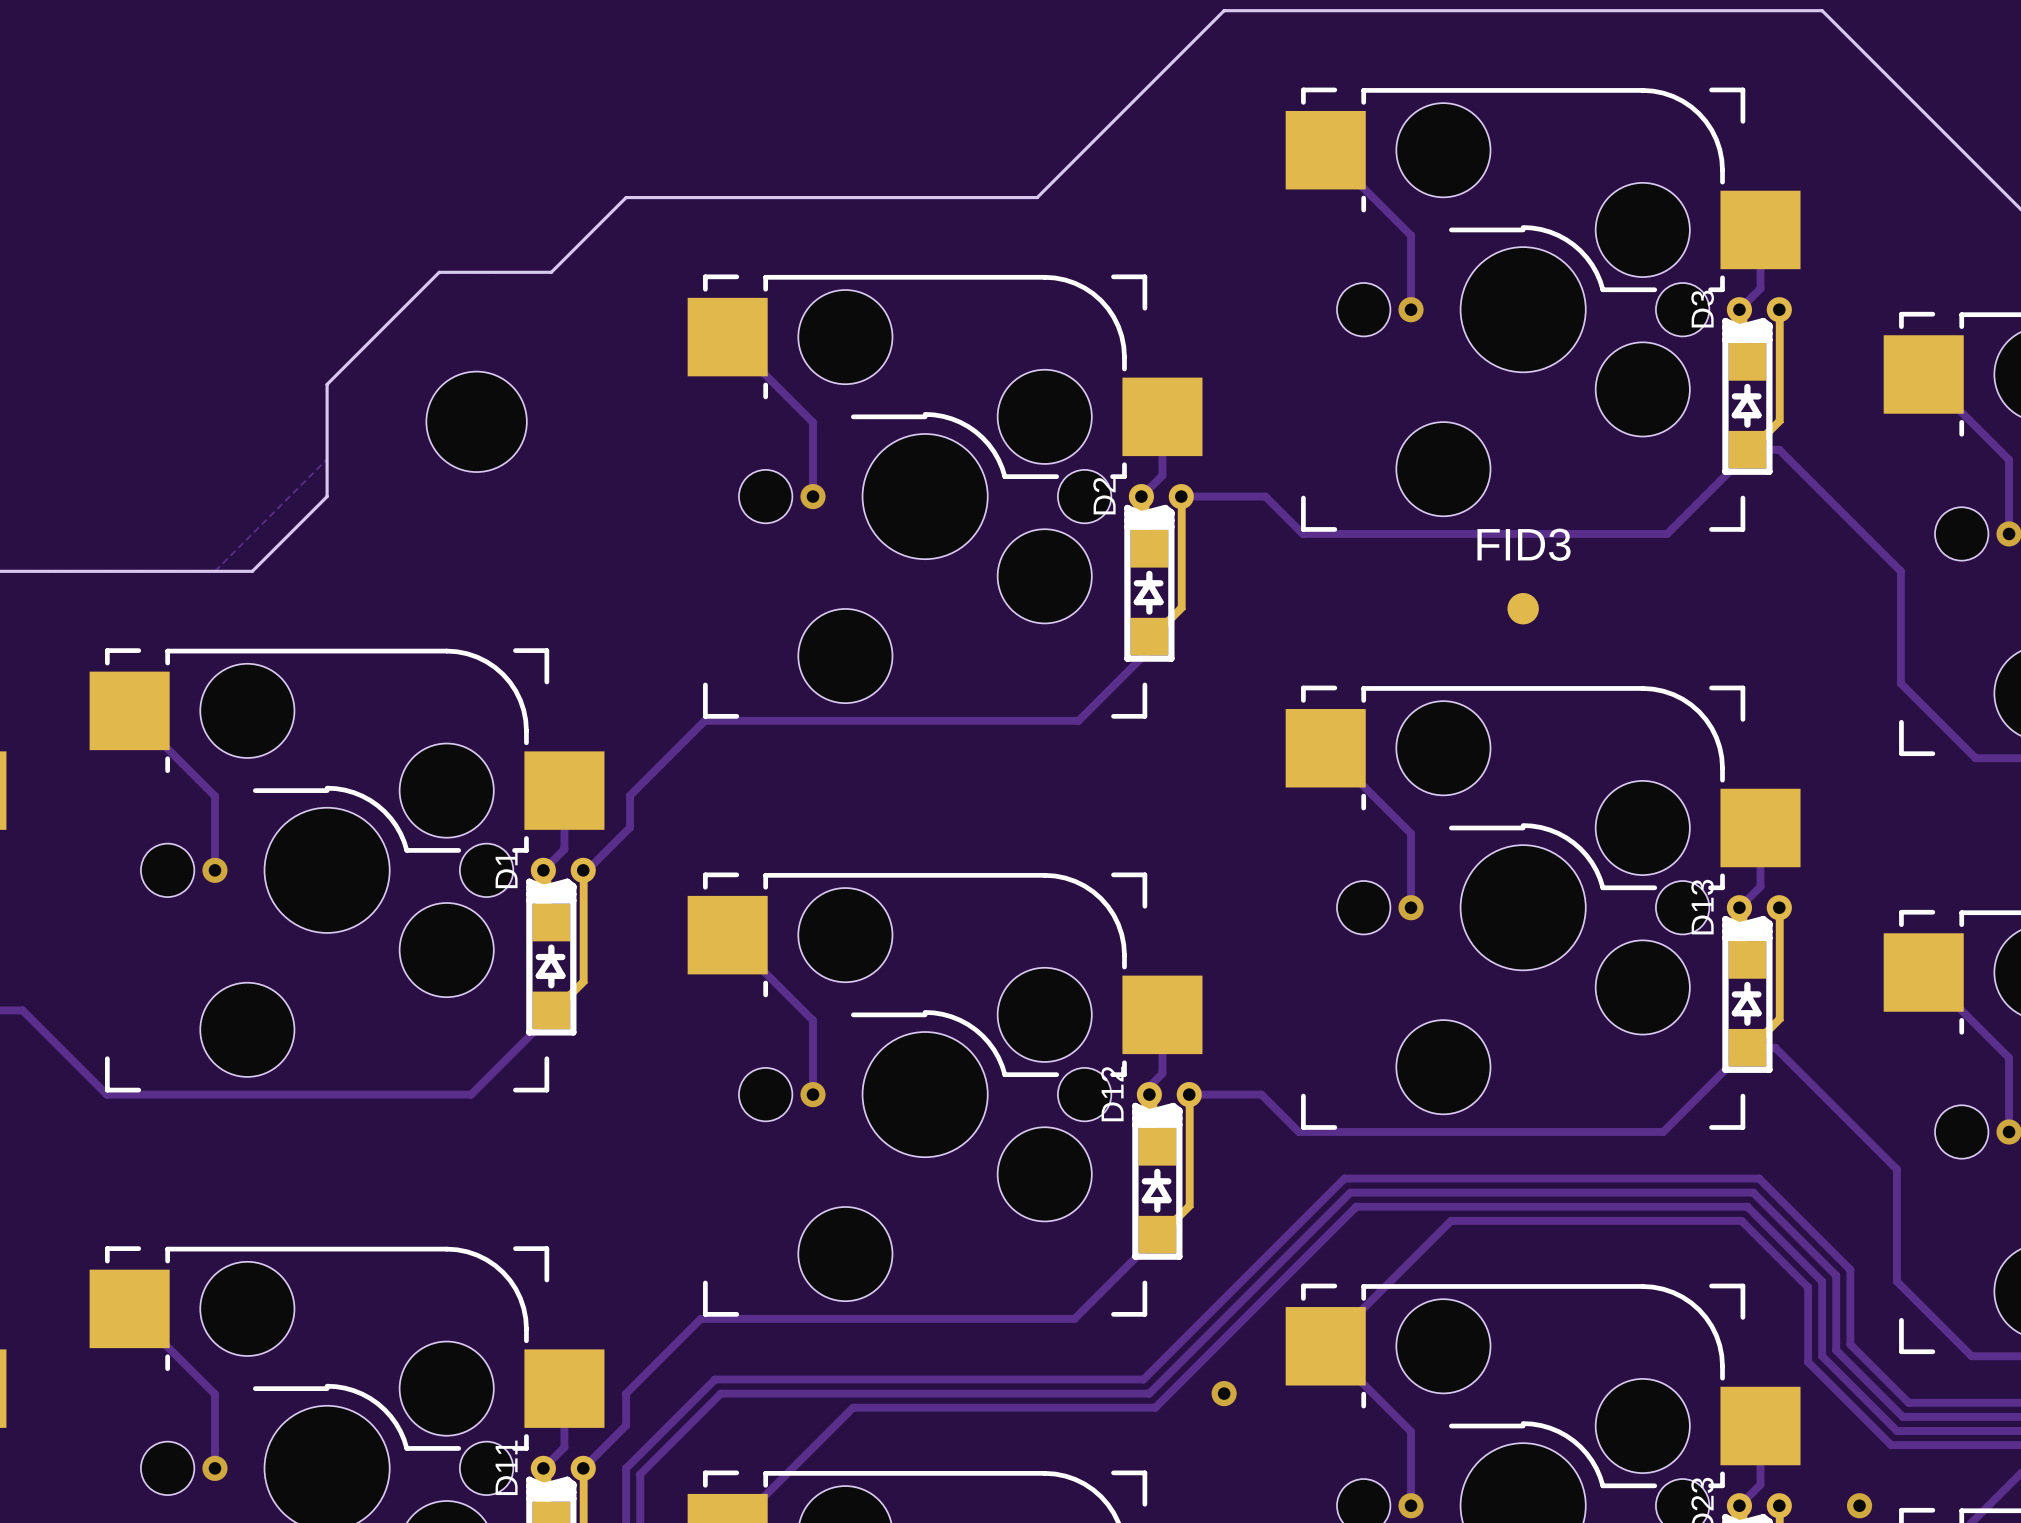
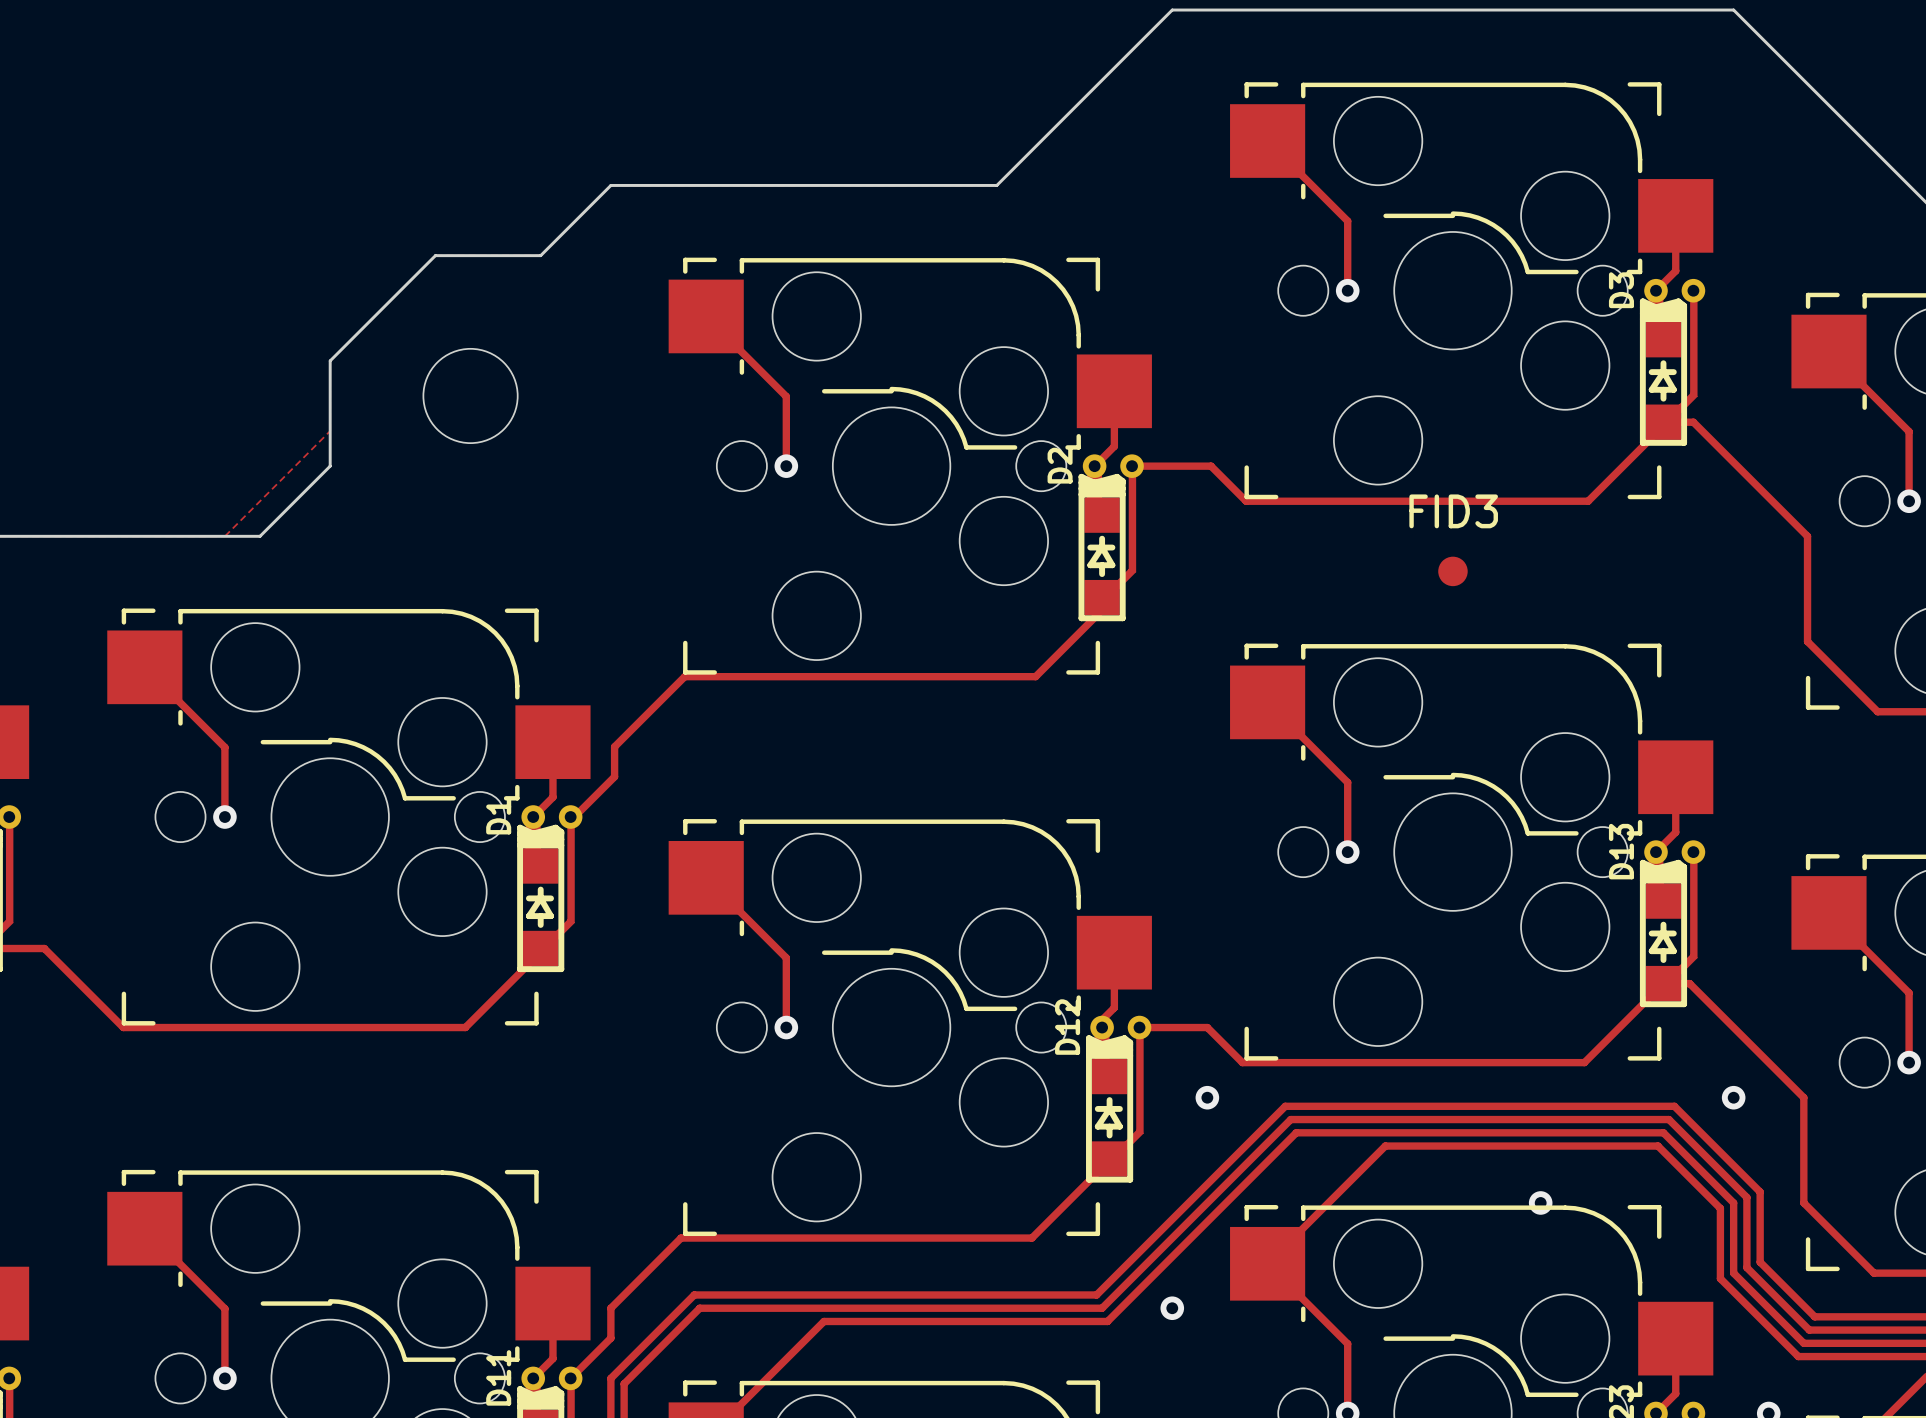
via: none -> (1207, 1097)
via: none -> (1733, 1097)
via: none -> (1540, 1202)

